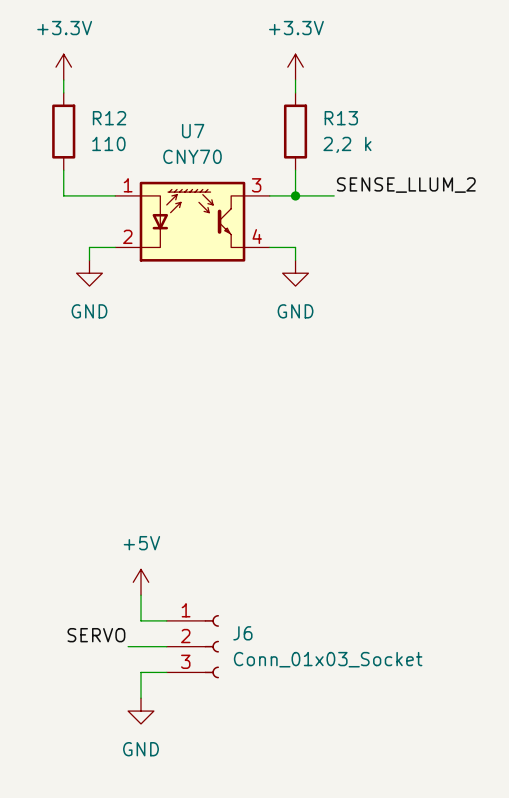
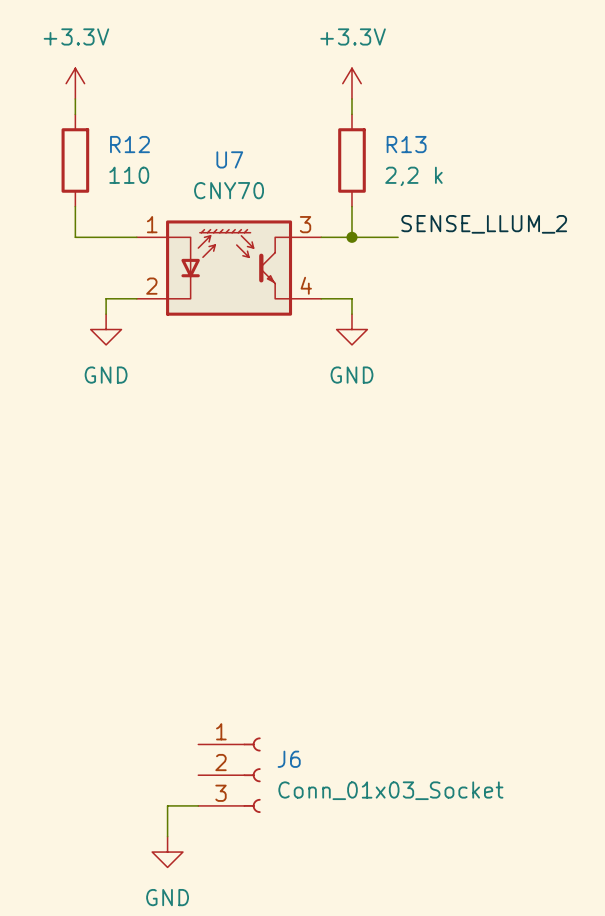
power symbol: +5V (141, 582) -> none
wire: (141, 595) (141, 620) (166, 620) -> none
label: SERVO (96, 635) -> none
wire: (128, 646) (166, 646) -> none

